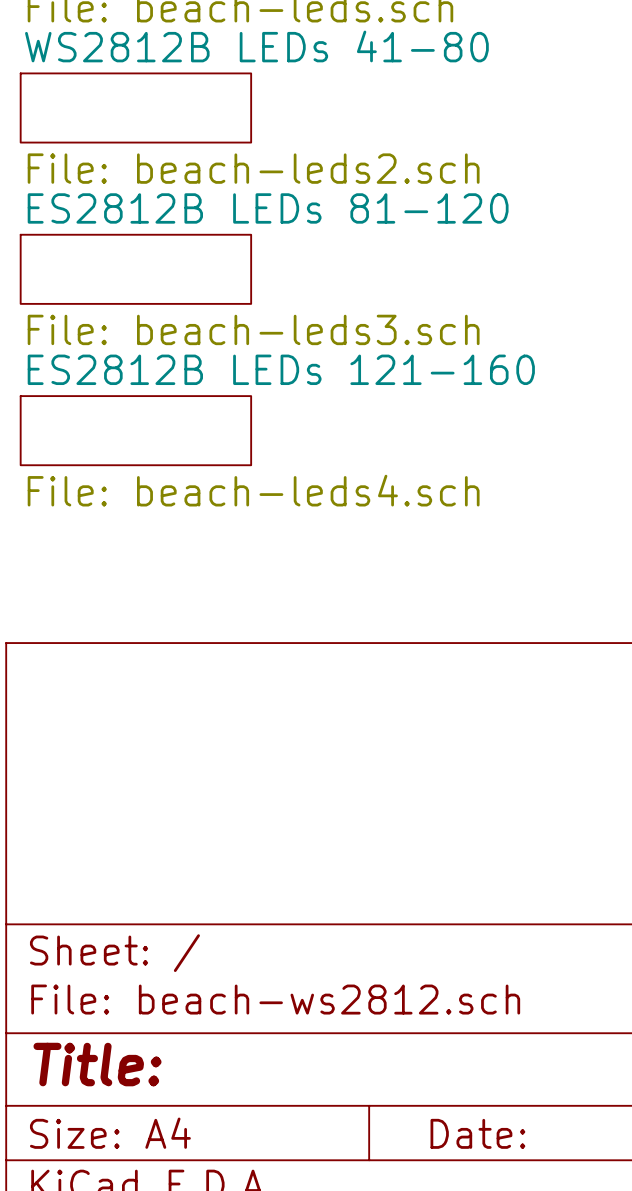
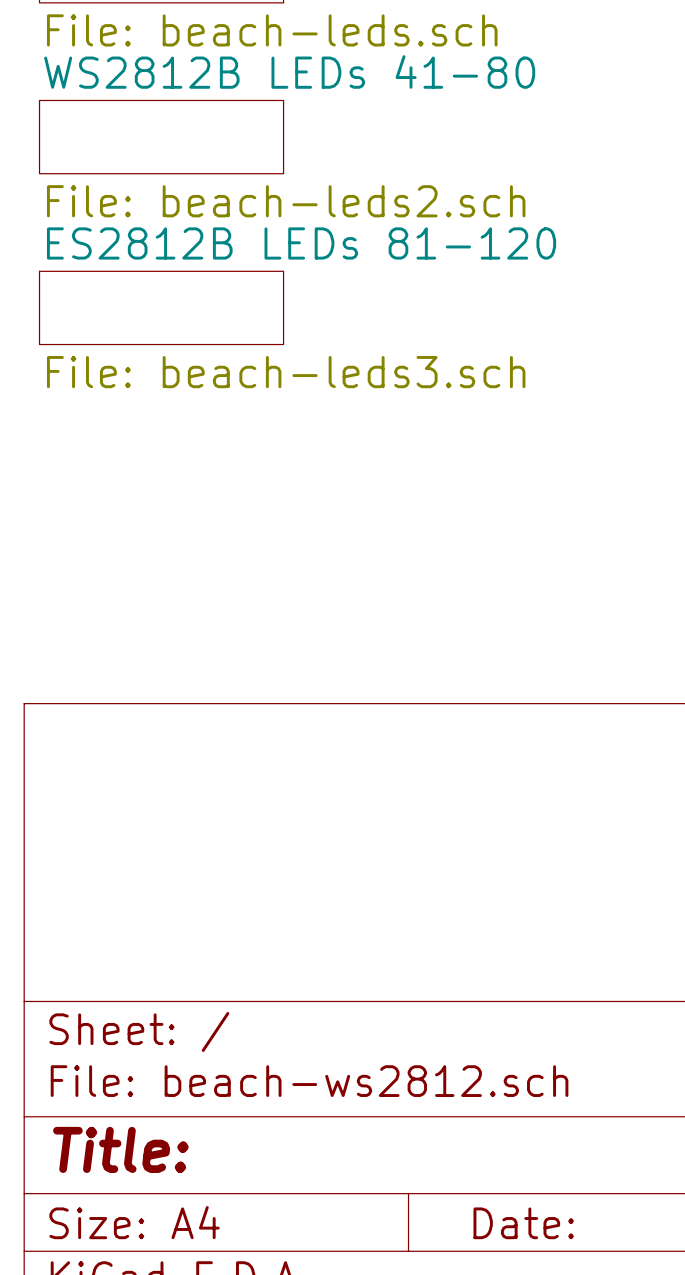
sheet ES2812B LEDs 121-160: File: beach-leds4.sch (135, 430) -> none

